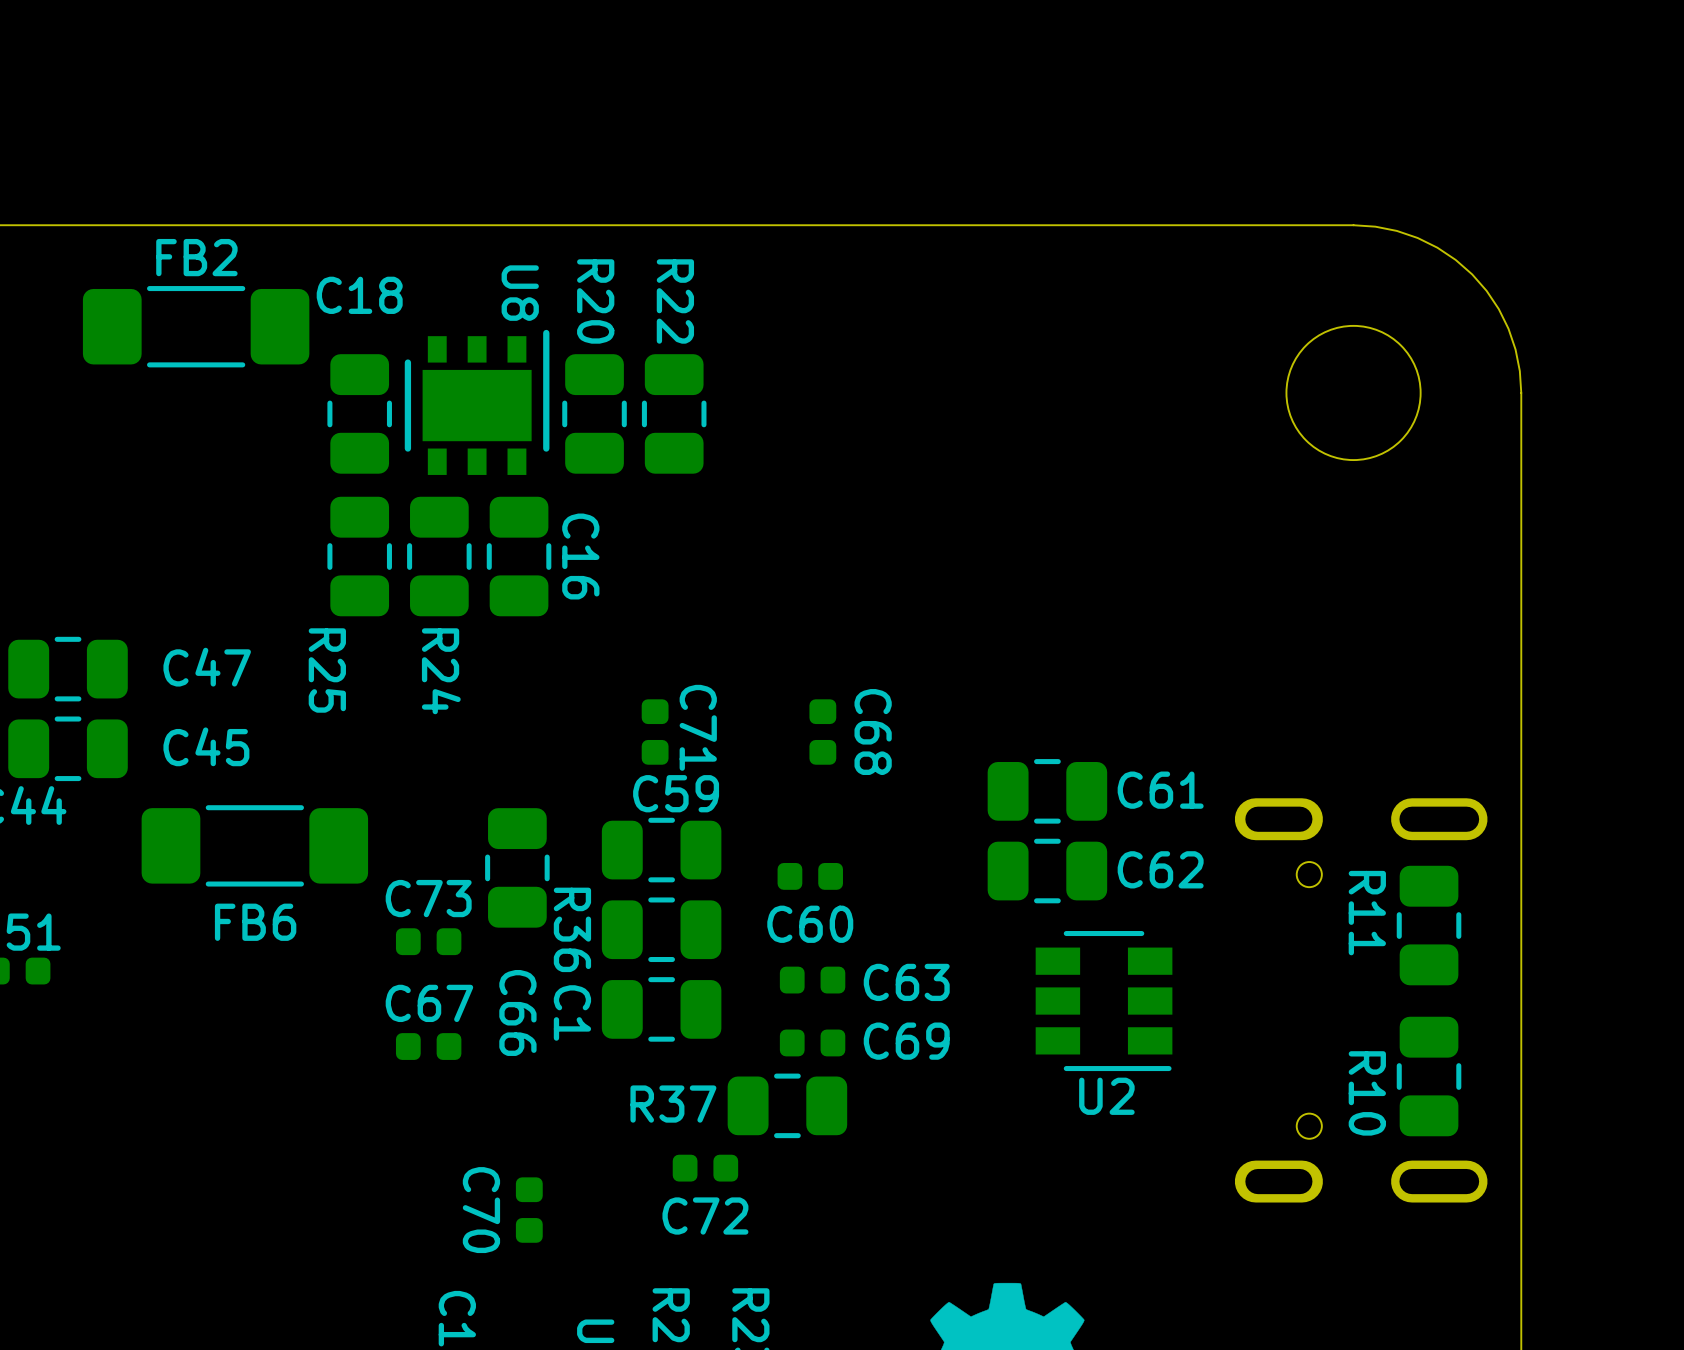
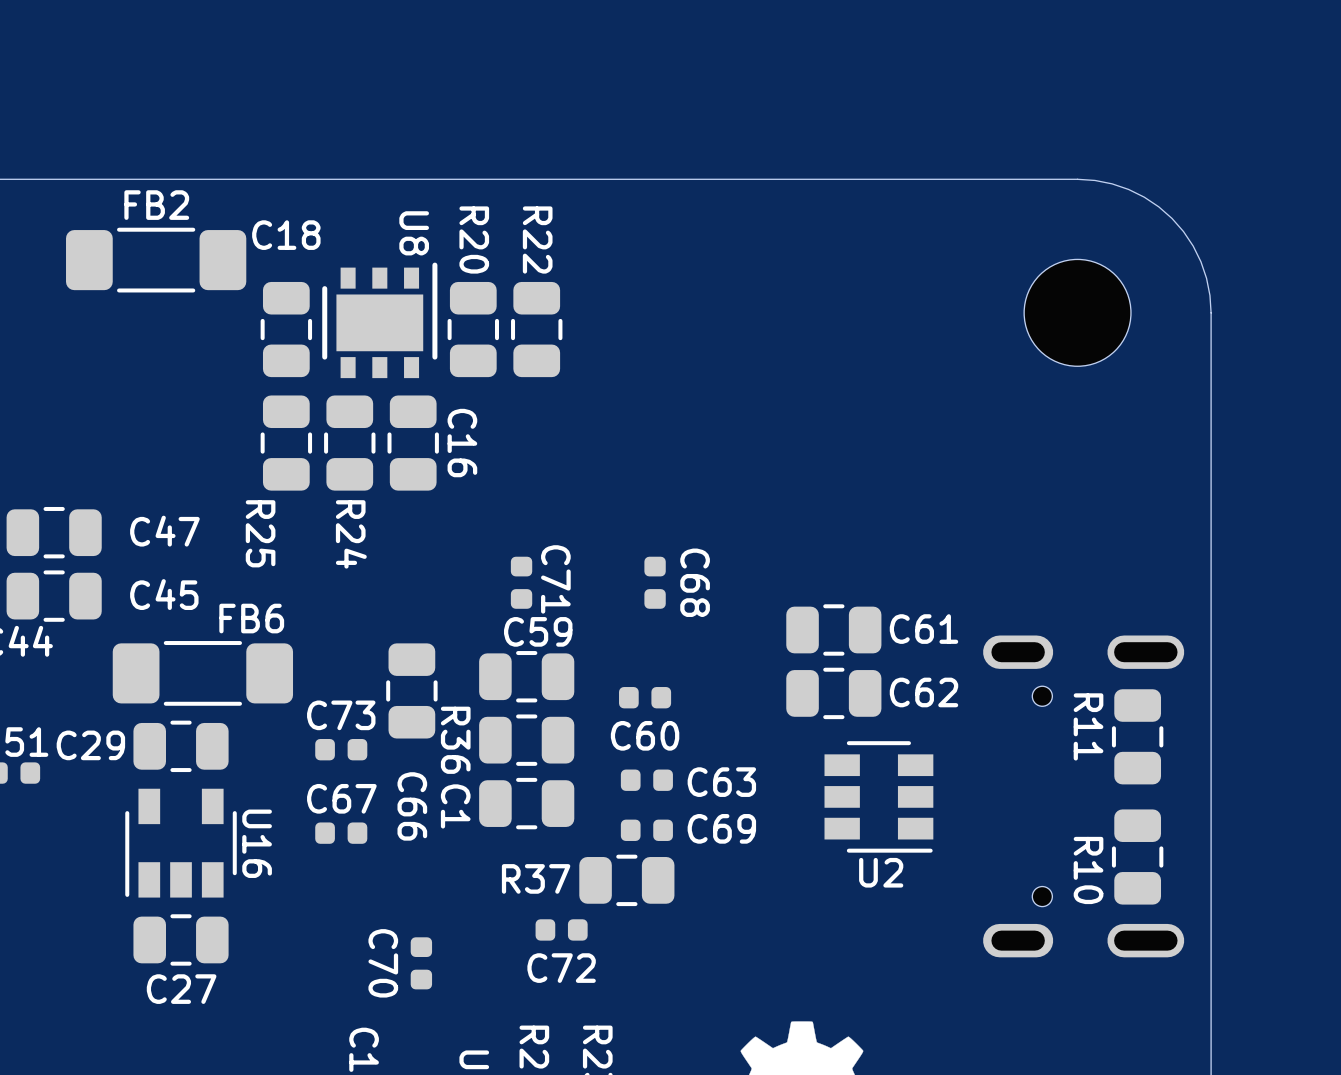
FB6 name position: FB6 (255, 922) -> FB6 (251, 618)
C29: none -> (181, 746)
U16: none -> (181, 843)
C27: none -> (181, 939)

